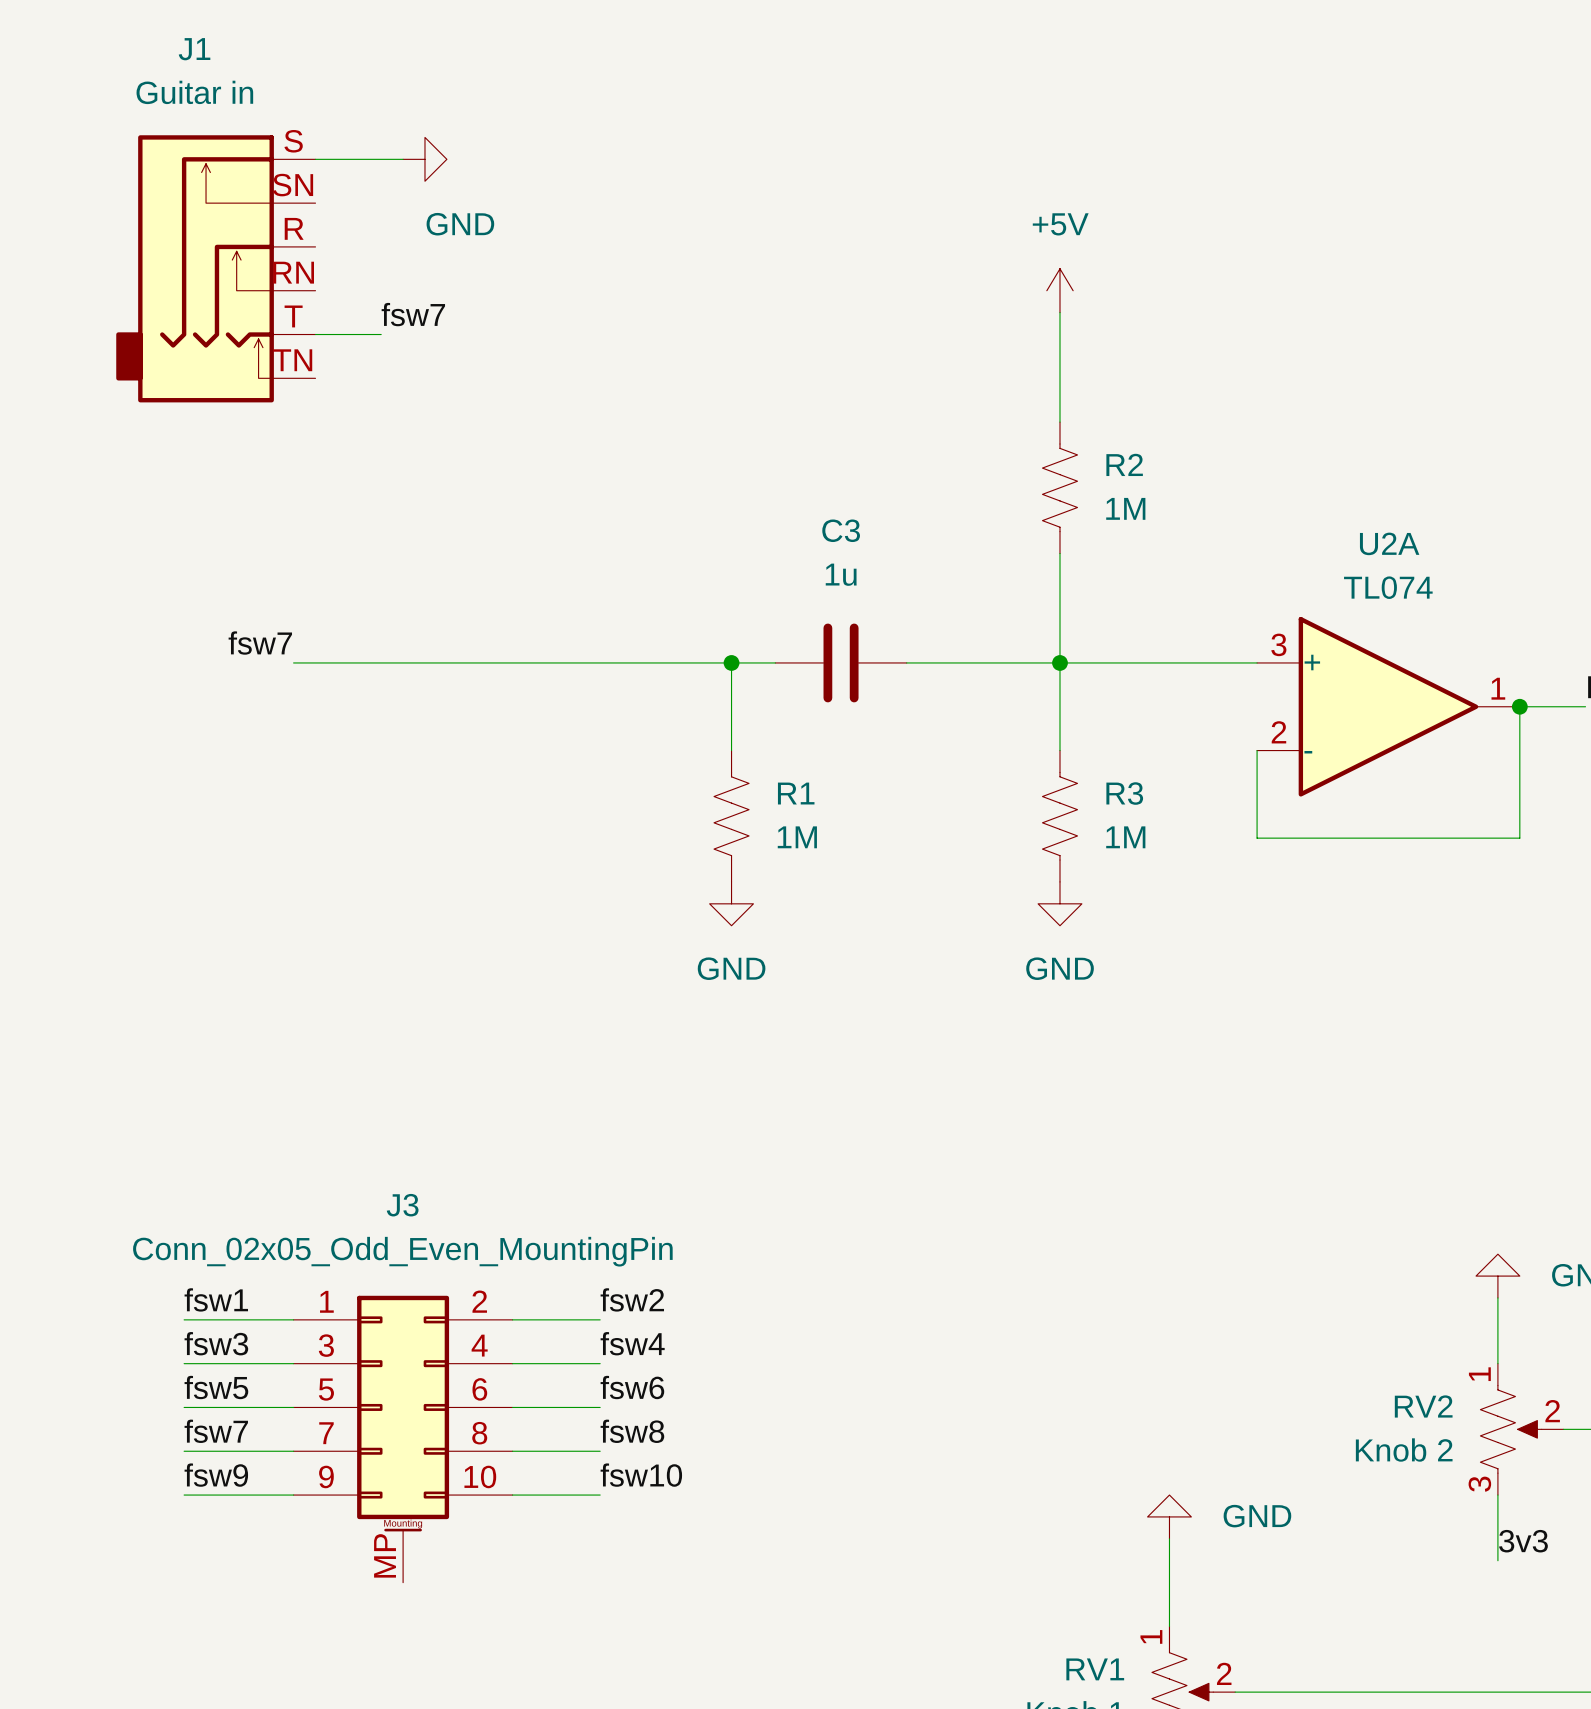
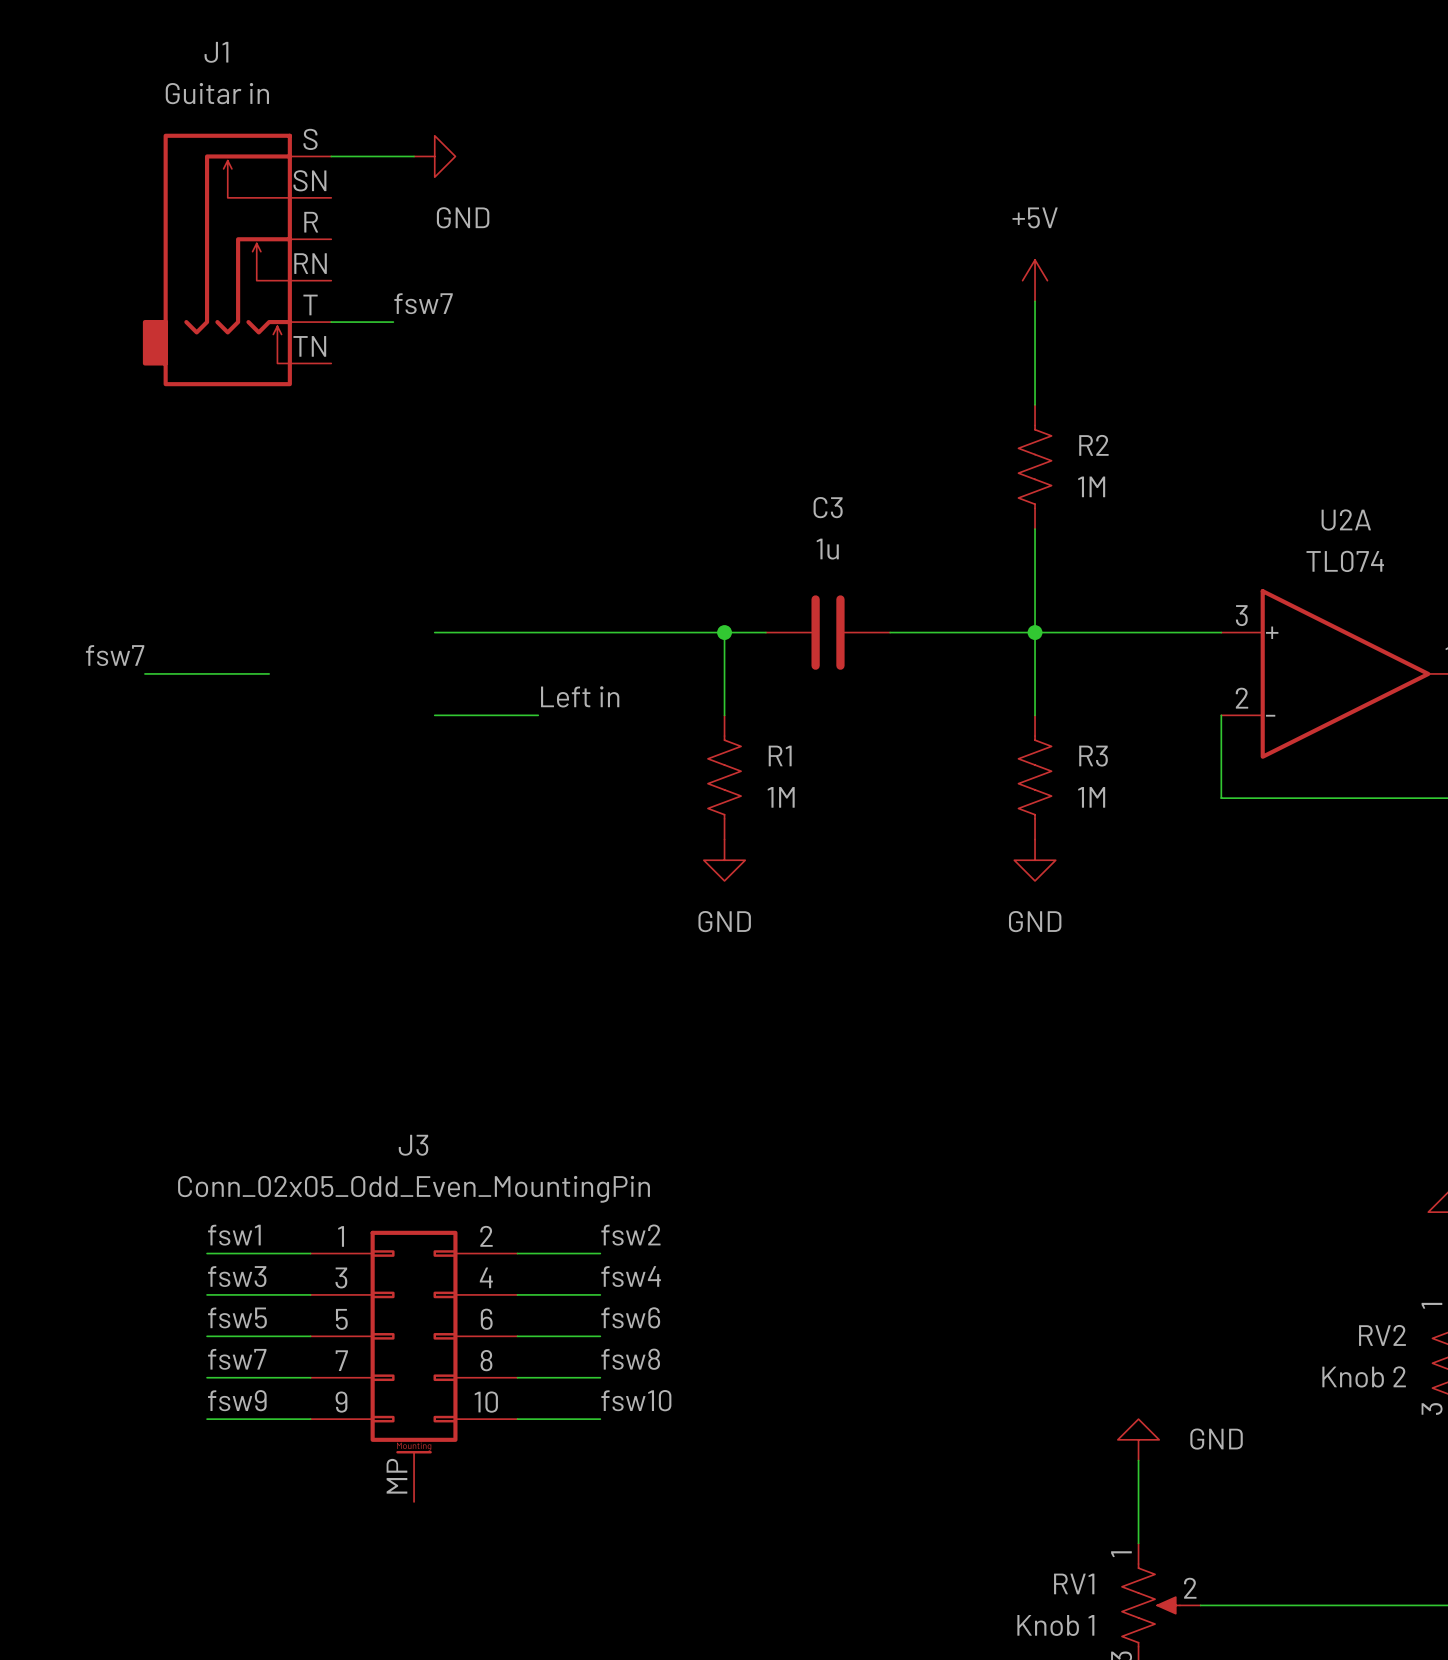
label position: fsw7 (260, 643) -> fsw7 (115, 655)
wire: (293, 662) (424, 662) -> (144, 673) (269, 673)
label: none -> Left in (580, 696)
wire: none -> (434, 715) (538, 715)

